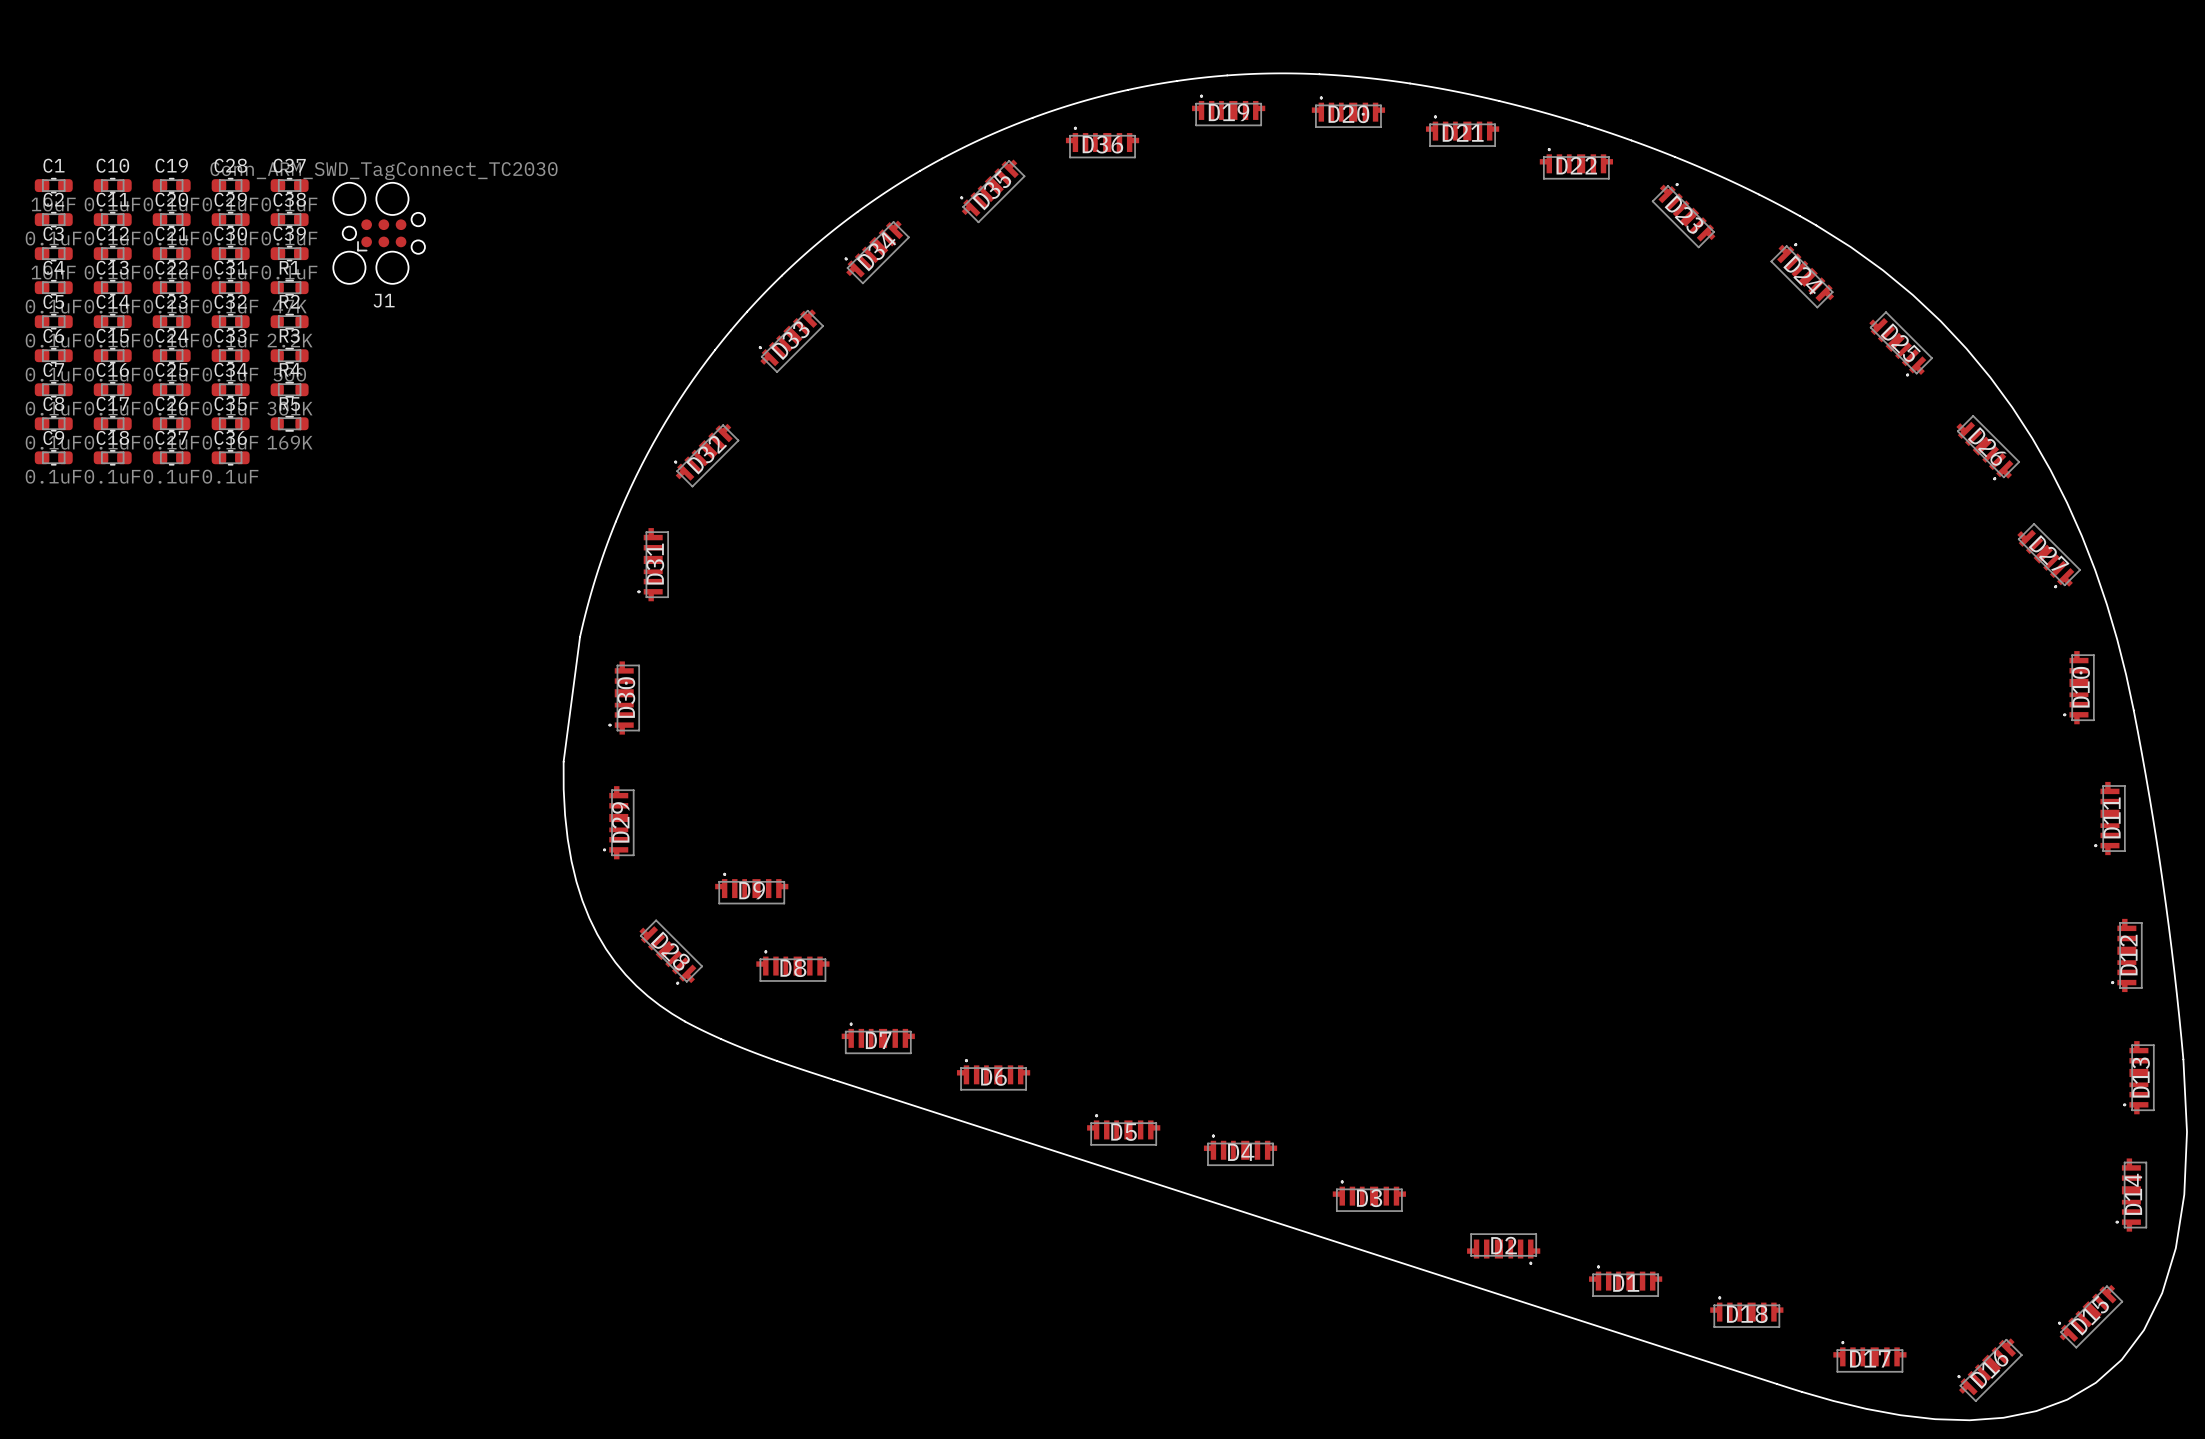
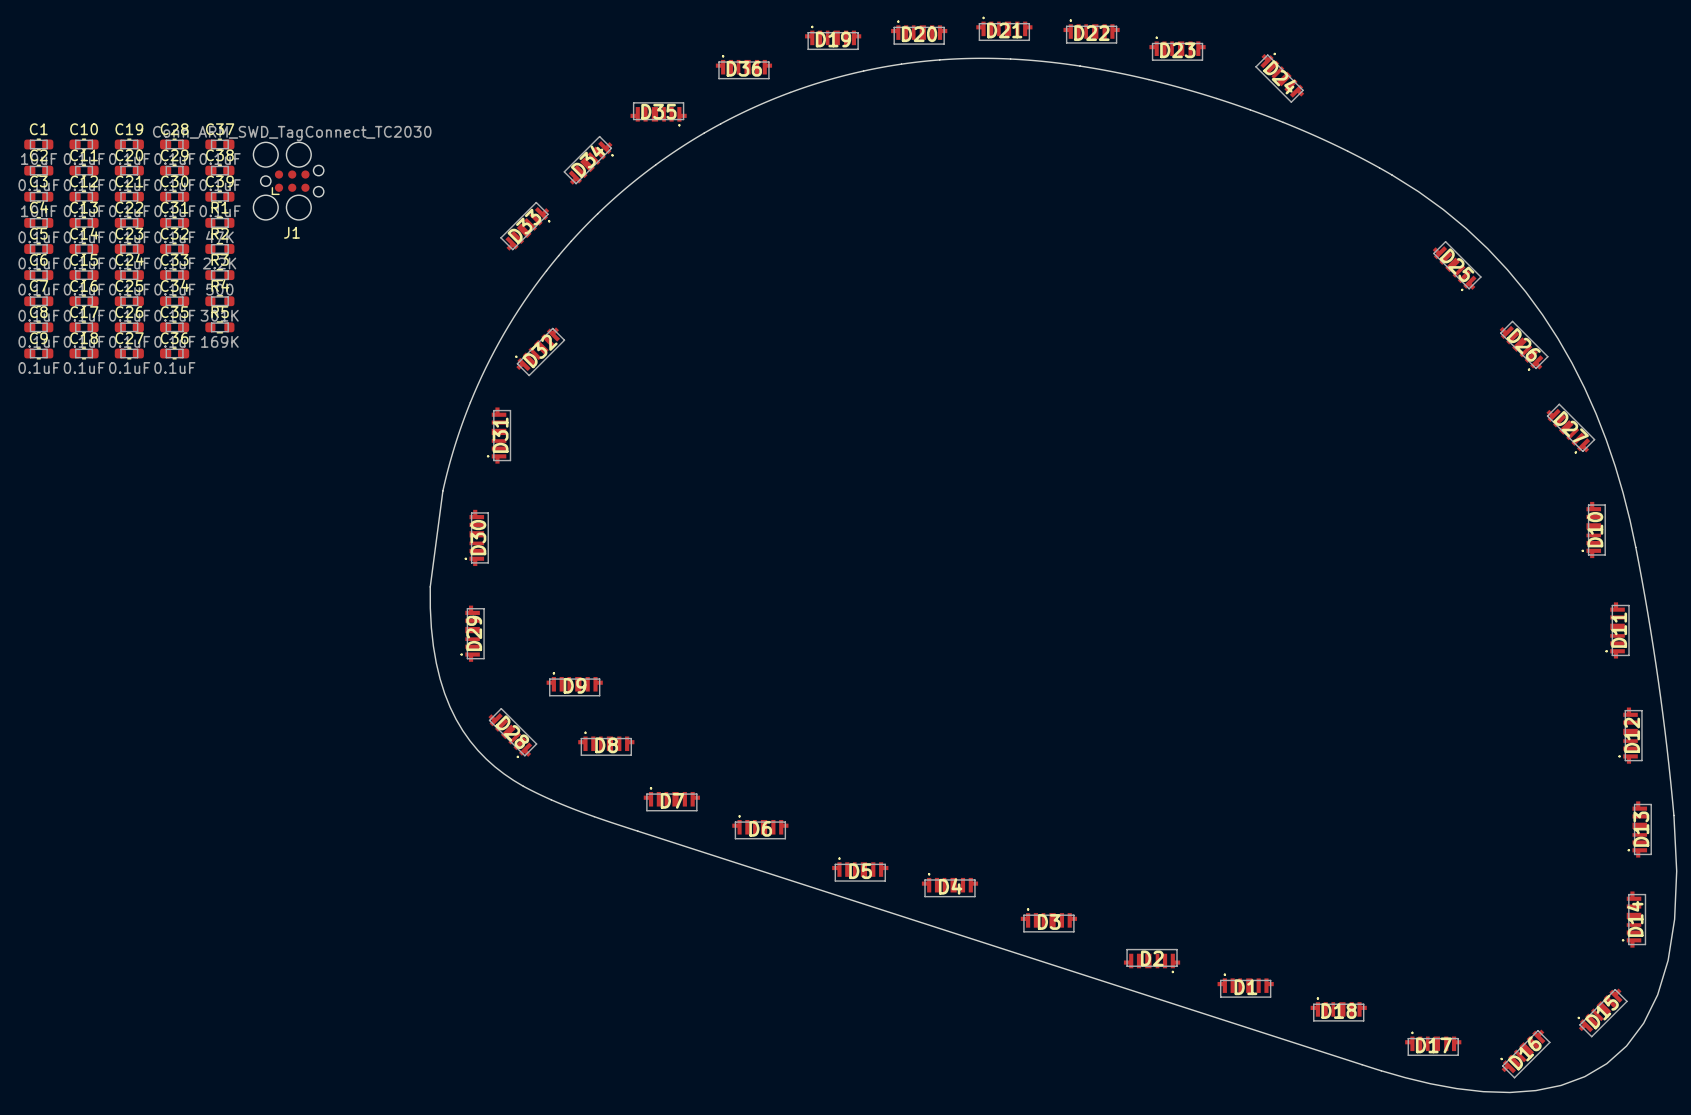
D19 position: (1228, 110) -> (833, 37)
D20 position: (1348, 112) -> (919, 32)
D21 position: (1462, 131) -> (1004, 28)
D36 position: (1102, 142) -> (743, 67)
D22 position: (1576, 163) -> (1091, 31)
D35 rotation: 0° (992, 191) -> 135° counterclockwise (658, 114)
D35 position: (992, 191) -> (658, 114)
D23 rotation: 0° (1683, 215) -> 45° counterclockwise (1177, 48)
D23 position: (1683, 215) -> (1177, 48)
D34 rotation: 0° (877, 252) -> 180° (588, 160)
D34 position: (877, 252) -> (588, 160)
D24 position: (1802, 275) -> (1279, 77)
D33 rotation: 0° (791, 341) -> 180° (525, 226)
D33 position: (791, 341) -> (525, 226)

